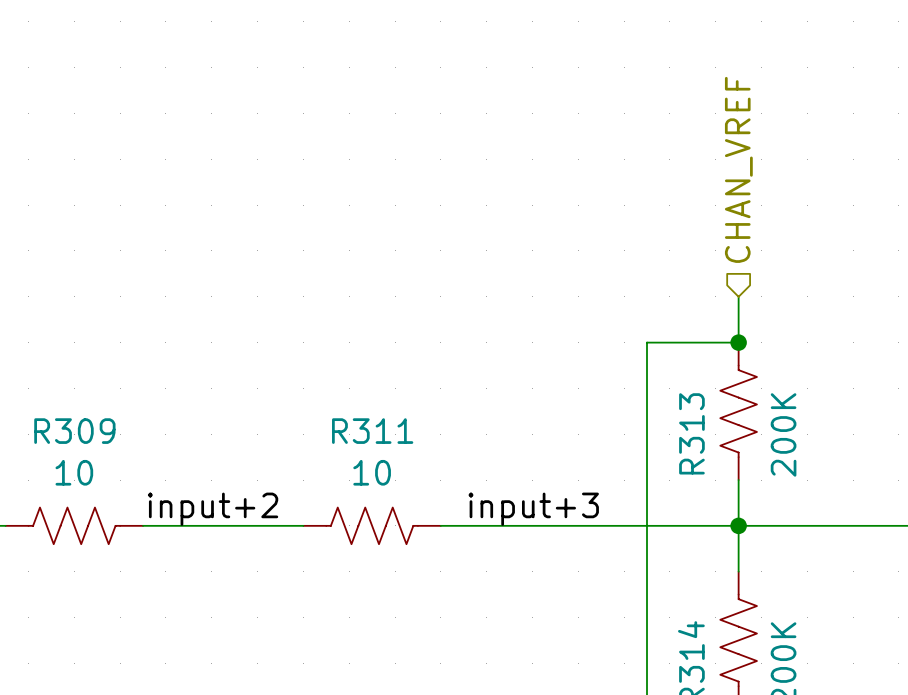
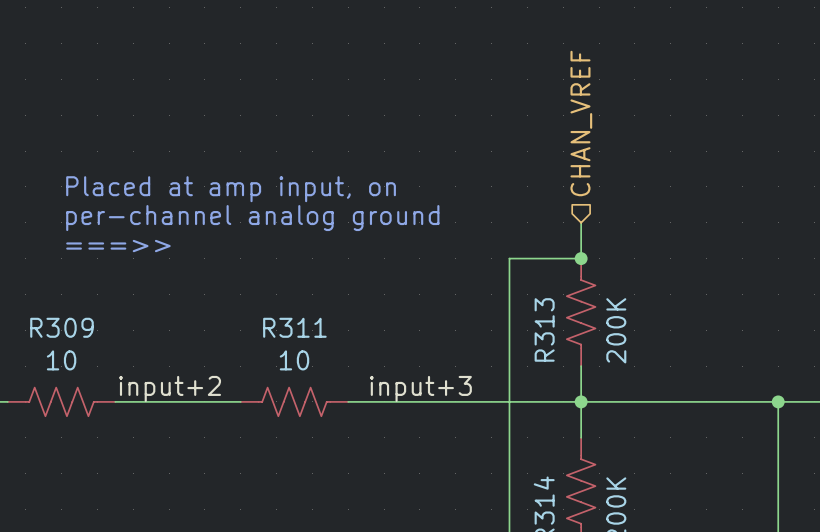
text: none -> Placed at amp input, on (231, 189)
text: none -> per-channel analog ground (252, 218)
text: none -> ===>> (118, 246)

